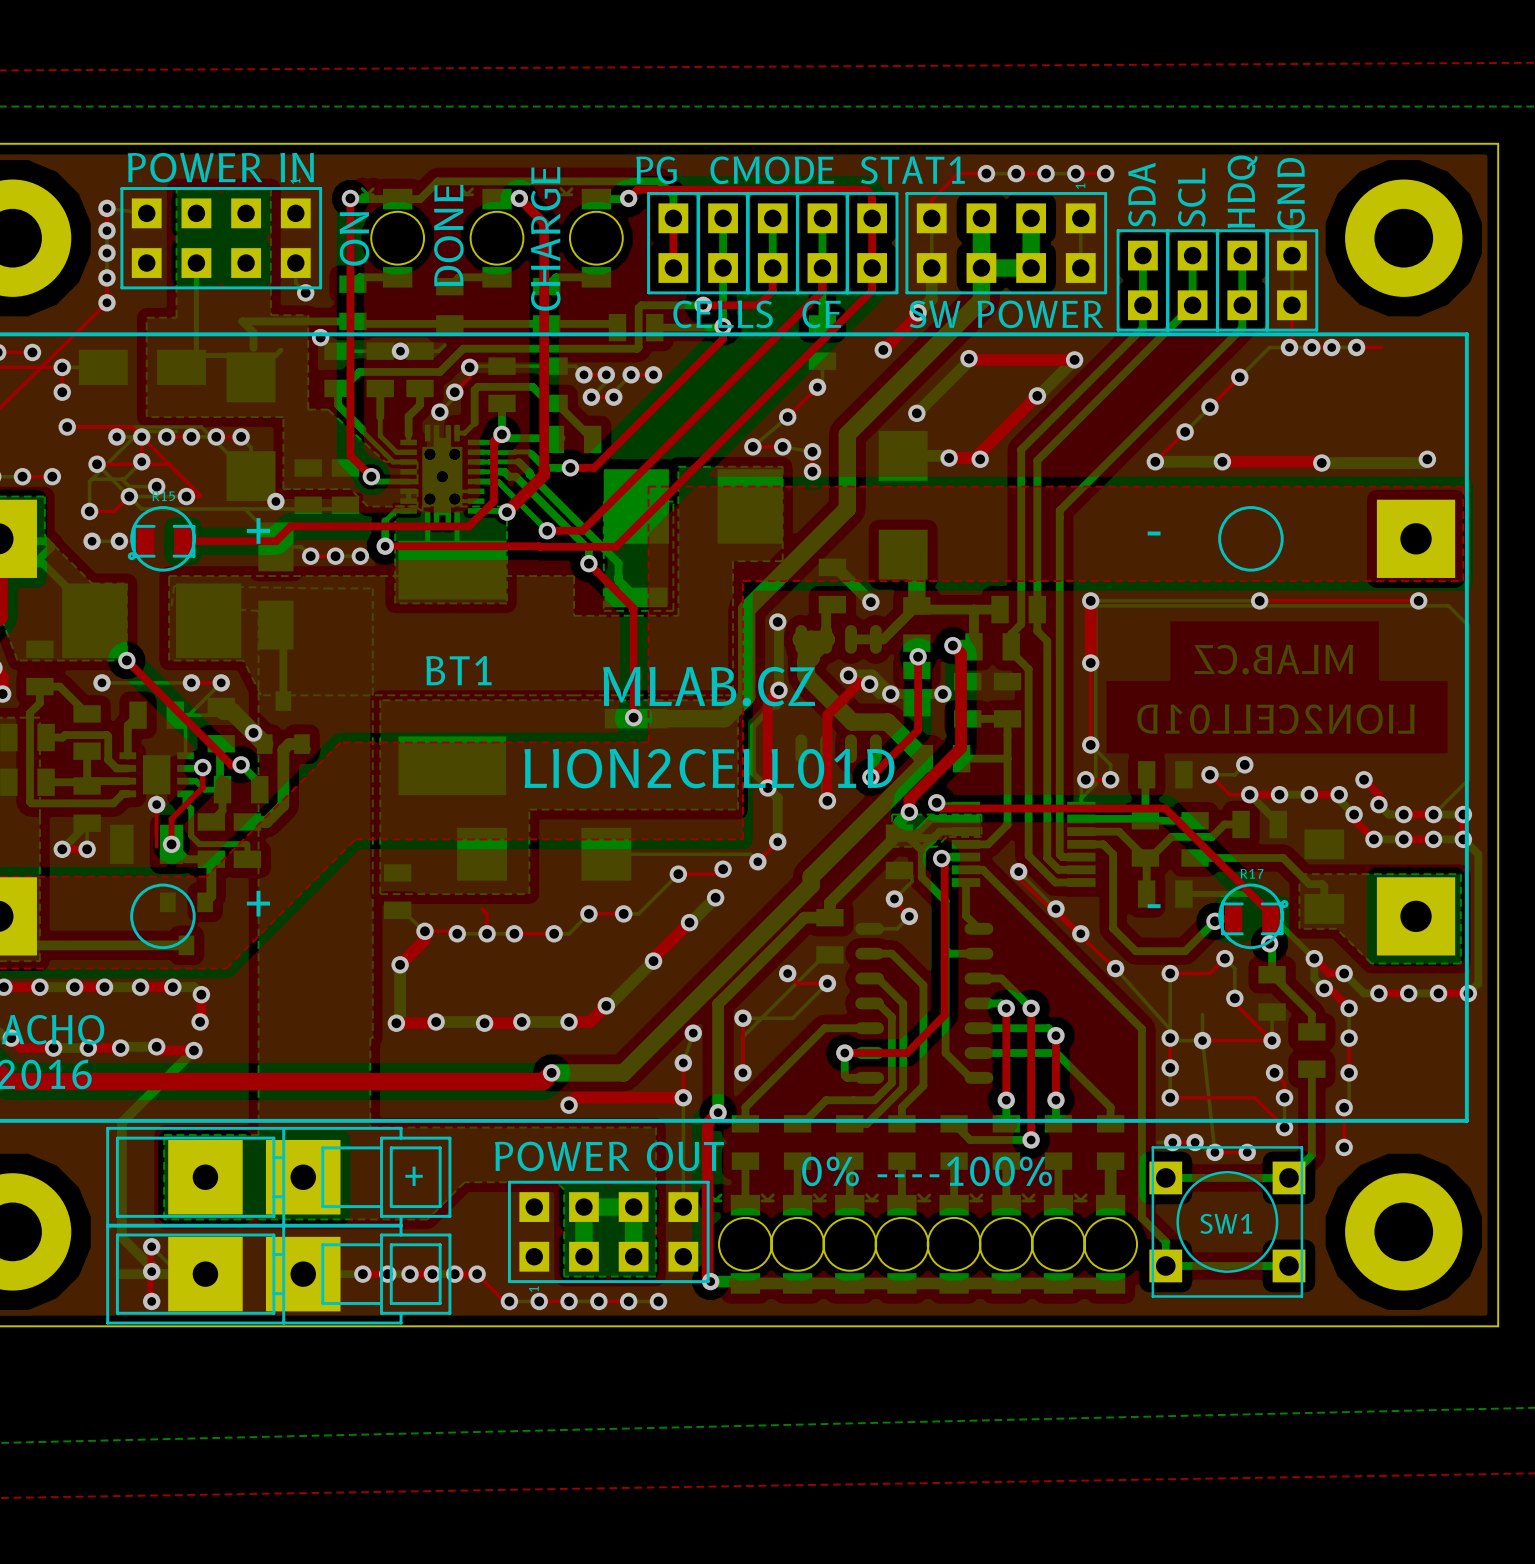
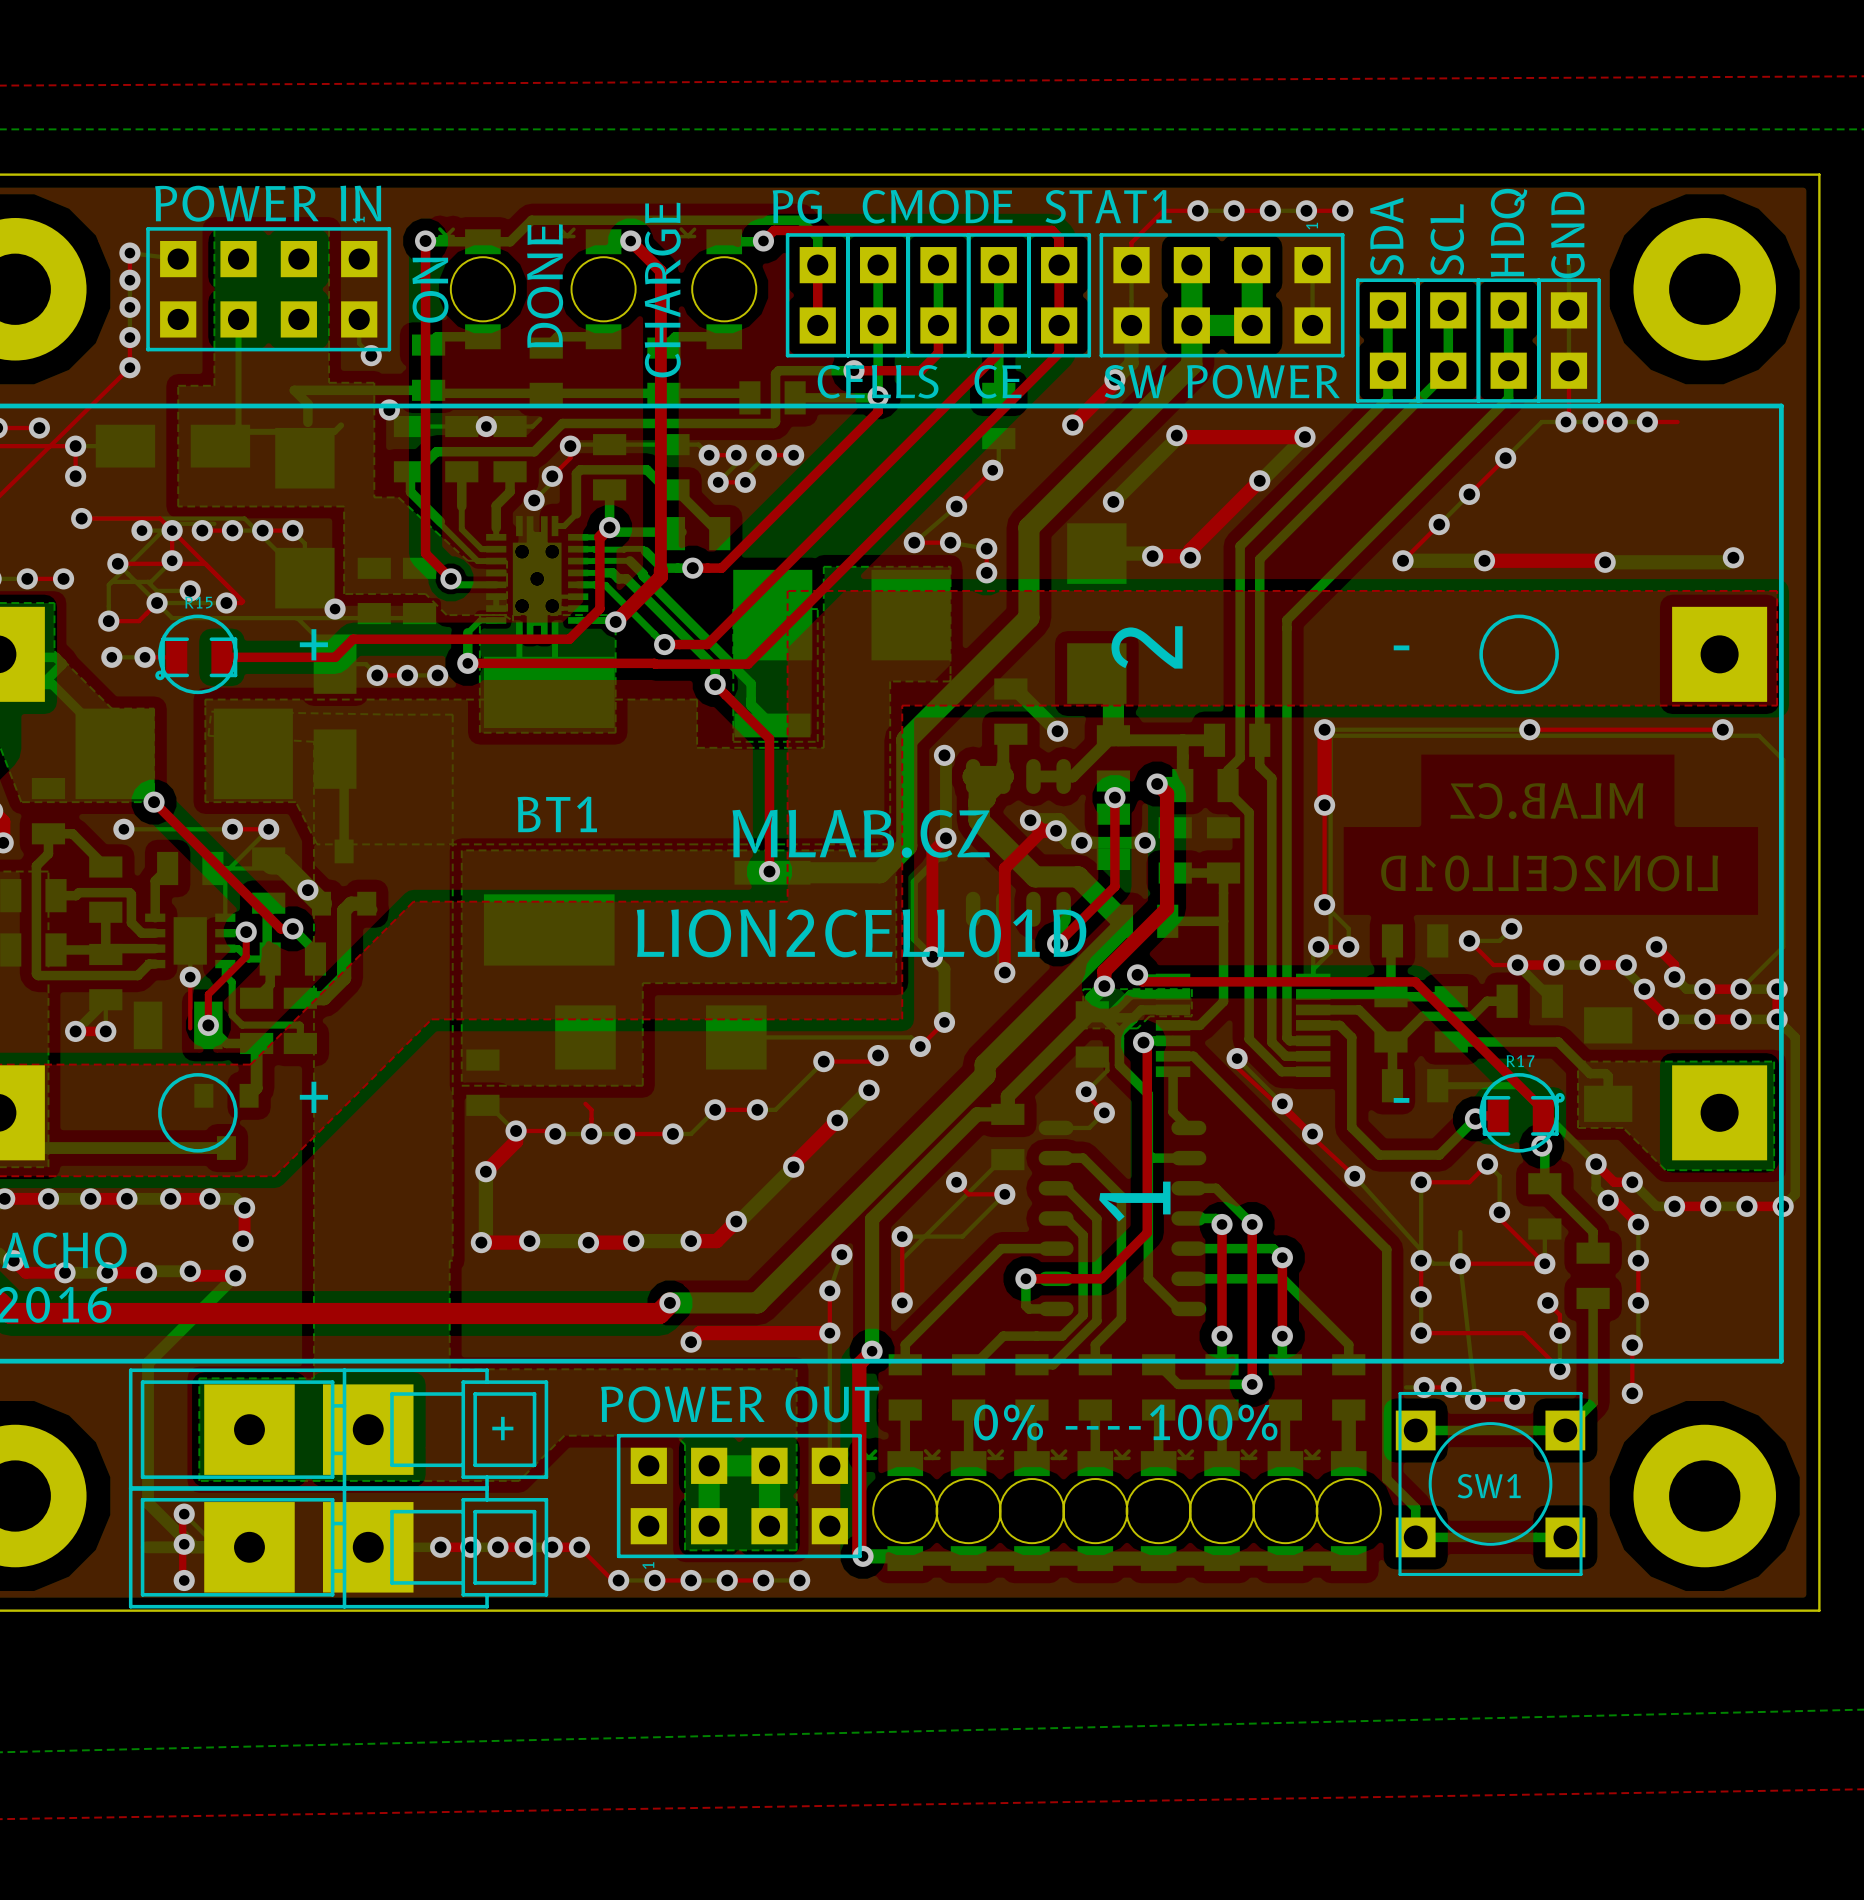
text: none -> 2 (1147, 647)
text: none -> 1 (1134, 1201)

